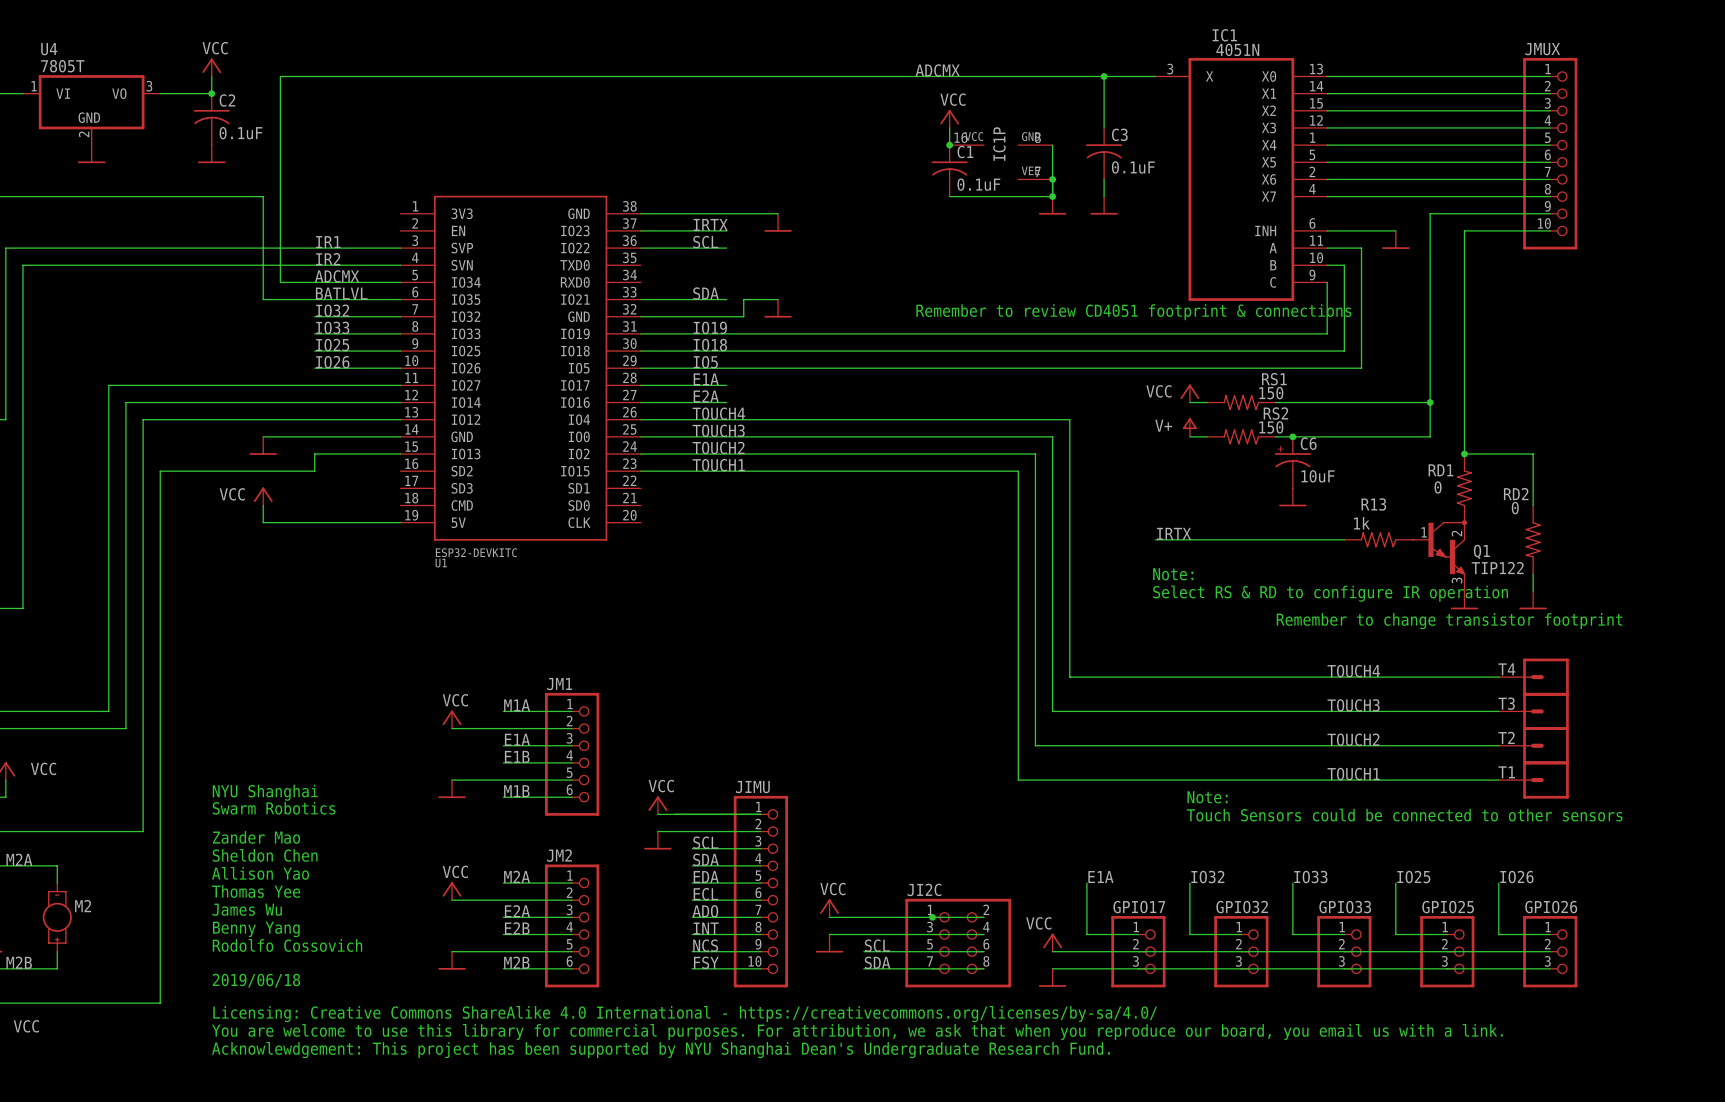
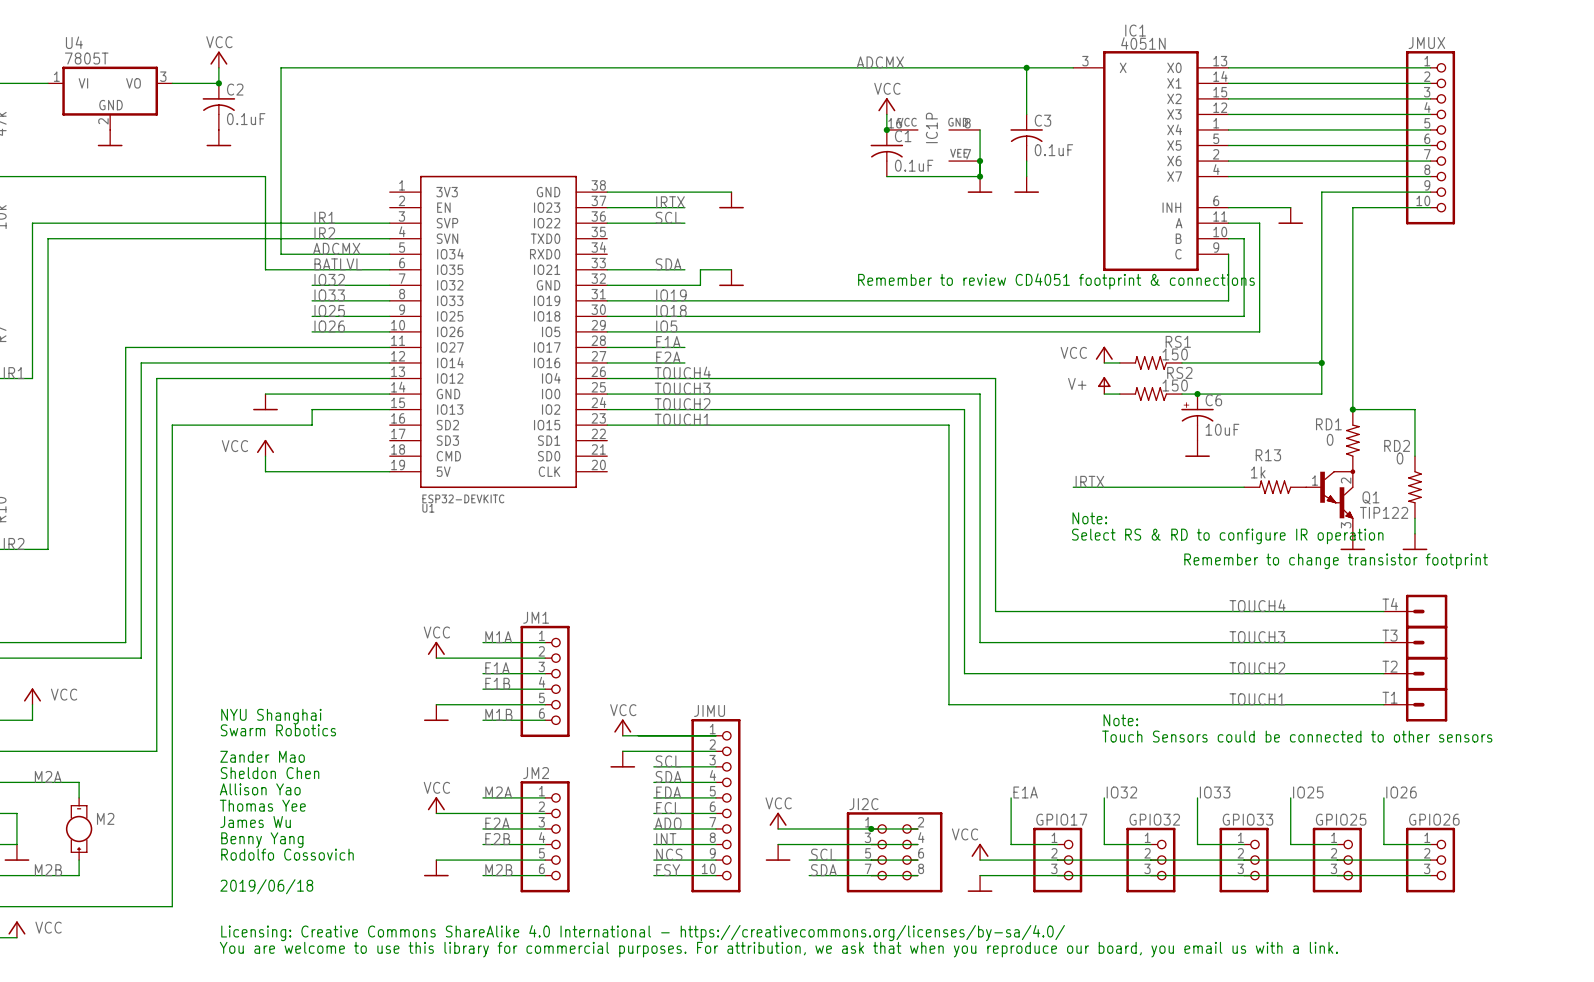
text: Licensing: Creative Commons ShareAlike 4.0 International - https://creativecommons.org/licenses/by-sa/4.0/ (685, 1014) -> none
text: You are welcome to use this library for commercial purposes. For attribution, we ask that when you reproduce our board, you email us with a link. (857, 1032) -> Licensing: Creative Commons ShareAlike 4.0 International - https://creativecommons.org/licenses/by-sa/4.0/ (643, 933)
text: Acknowlewdgement: This project has been supported by NYU Shanghai Dean's Undergraduate Research Fund. (660, 1050) -> You are welcome to use this library for commercial purposes. For attribution, we ask that when you reproduce our board, you email us with a link. (778, 949)

